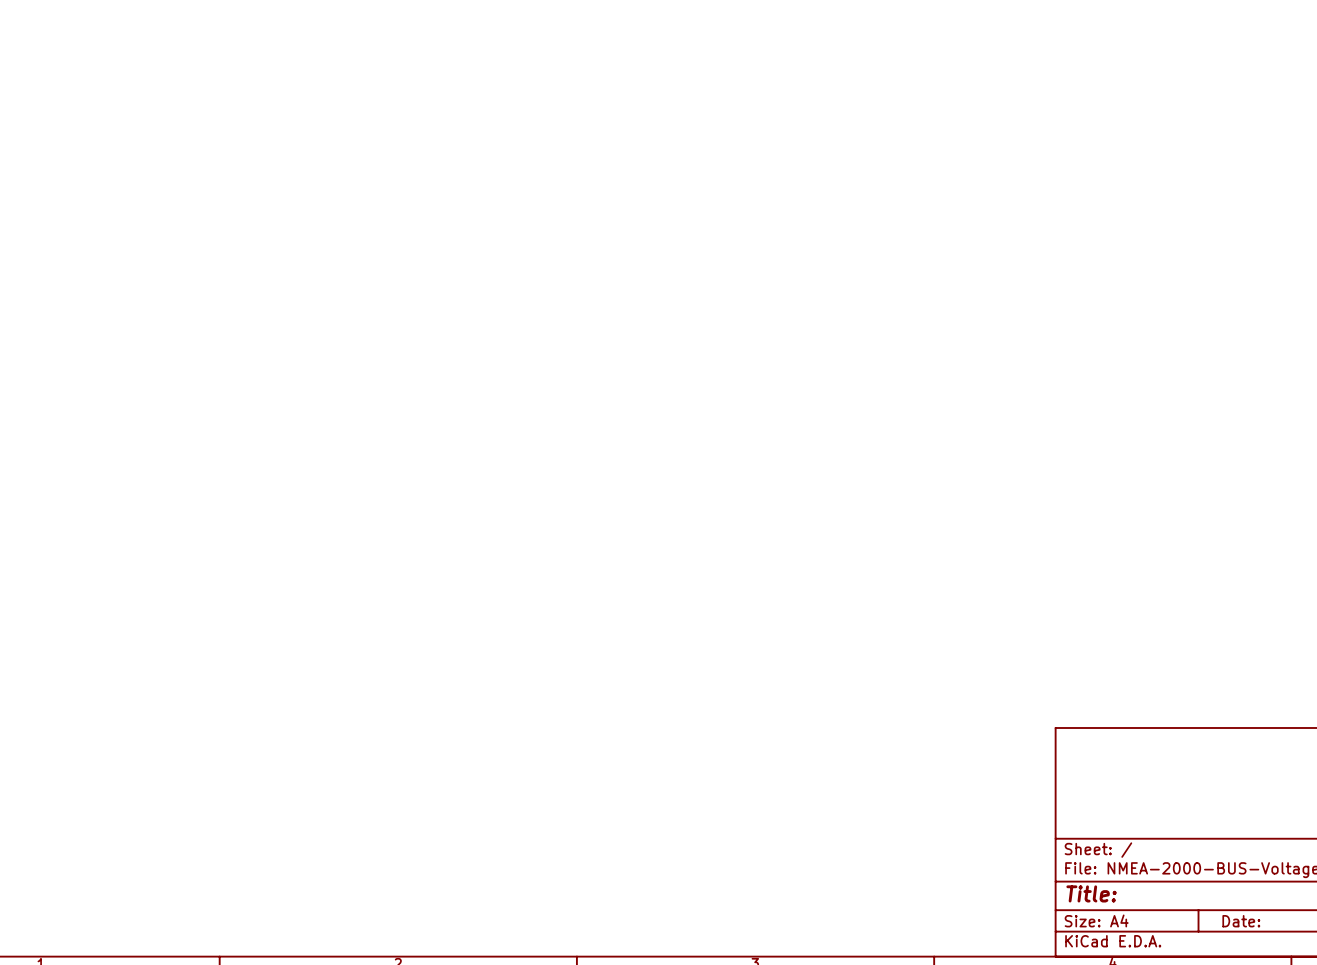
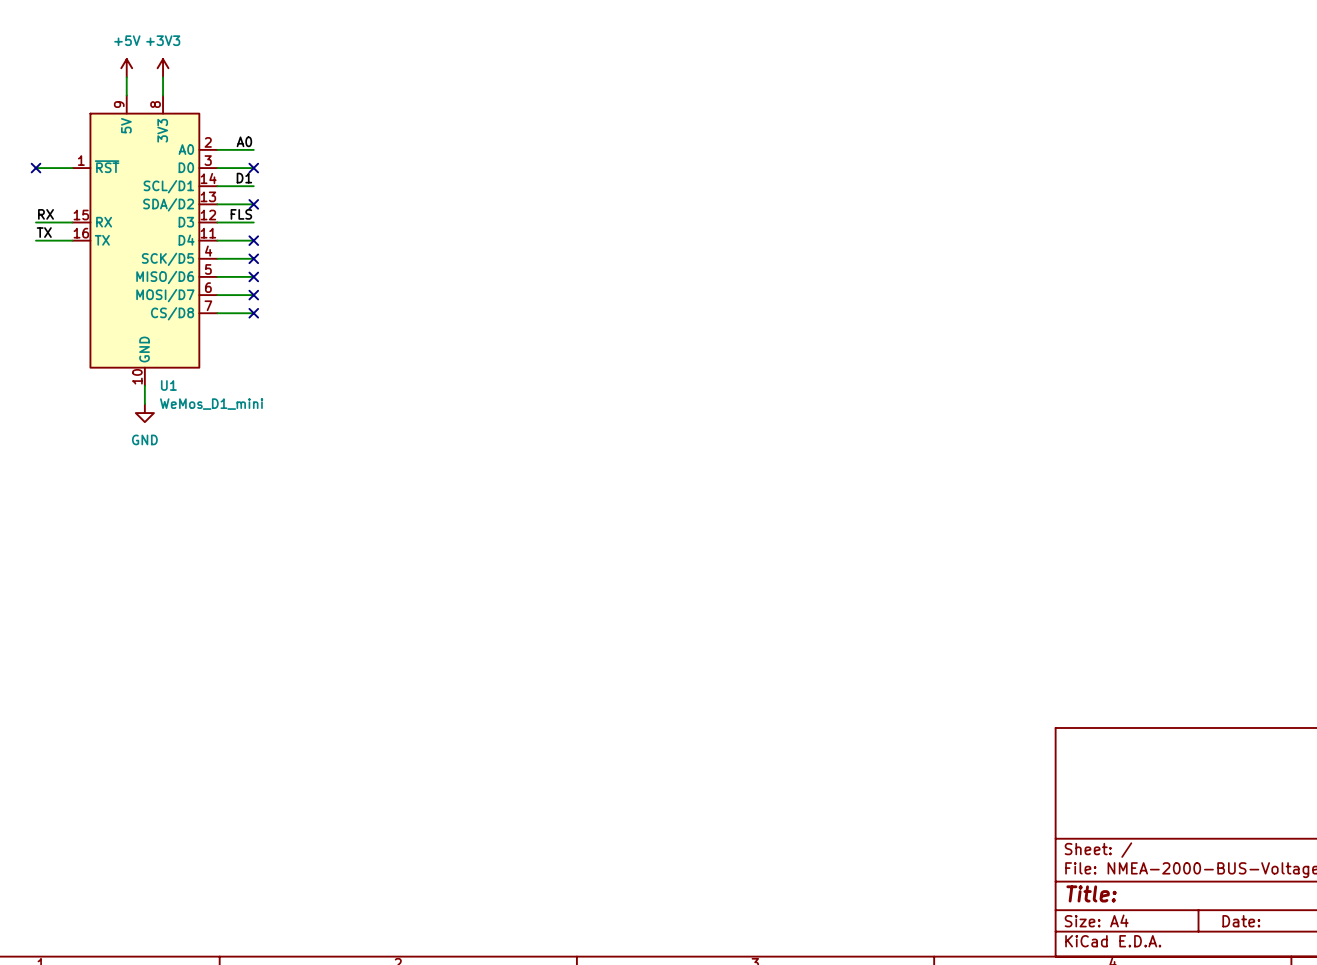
power symbol: none -> +5V (126, 68)
power symbol: none -> +3V3 (163, 68)
wire: none -> (126, 77) (126, 95)
wire: none -> (163, 77) (163, 95)
label: none -> A0 (244, 141)
wire: none -> (217, 149) (253, 149)
wire: none -> (35, 168) (72, 168)
no-connect mark: none -> (35, 168)
wire: none -> (217, 168) (253, 168)
no-connect mark: none -> (253, 168)
label: none -> D1 (244, 178)
wire: none -> (217, 186) (253, 186)
wire: none -> (217, 204) (253, 204)
no-connect mark: none -> (253, 204)
label: none -> RX (46, 214)
label: none -> FLS (241, 214)
wire: none -> (35, 222) (72, 222)
wire: none -> (217, 222) (253, 222)
label: none -> TX (44, 232)
wire: none -> (35, 240) (72, 240)
U1: none -> WeMos_D1_mini (144, 240)
wire: none -> (217, 240) (253, 240)
no-connect mark: none -> (253, 240)
wire: none -> (217, 258) (253, 258)
no-connect mark: none -> (253, 258)
wire: none -> (217, 276) (253, 276)
no-connect mark: none -> (253, 276)
wire: none -> (217, 295) (253, 295)
no-connect mark: none -> (253, 295)
wire: none -> (217, 313) (253, 313)
no-connect mark: none -> (253, 313)
wire: none -> (144, 385) (144, 403)
power symbol: none -> GND (144, 413)

